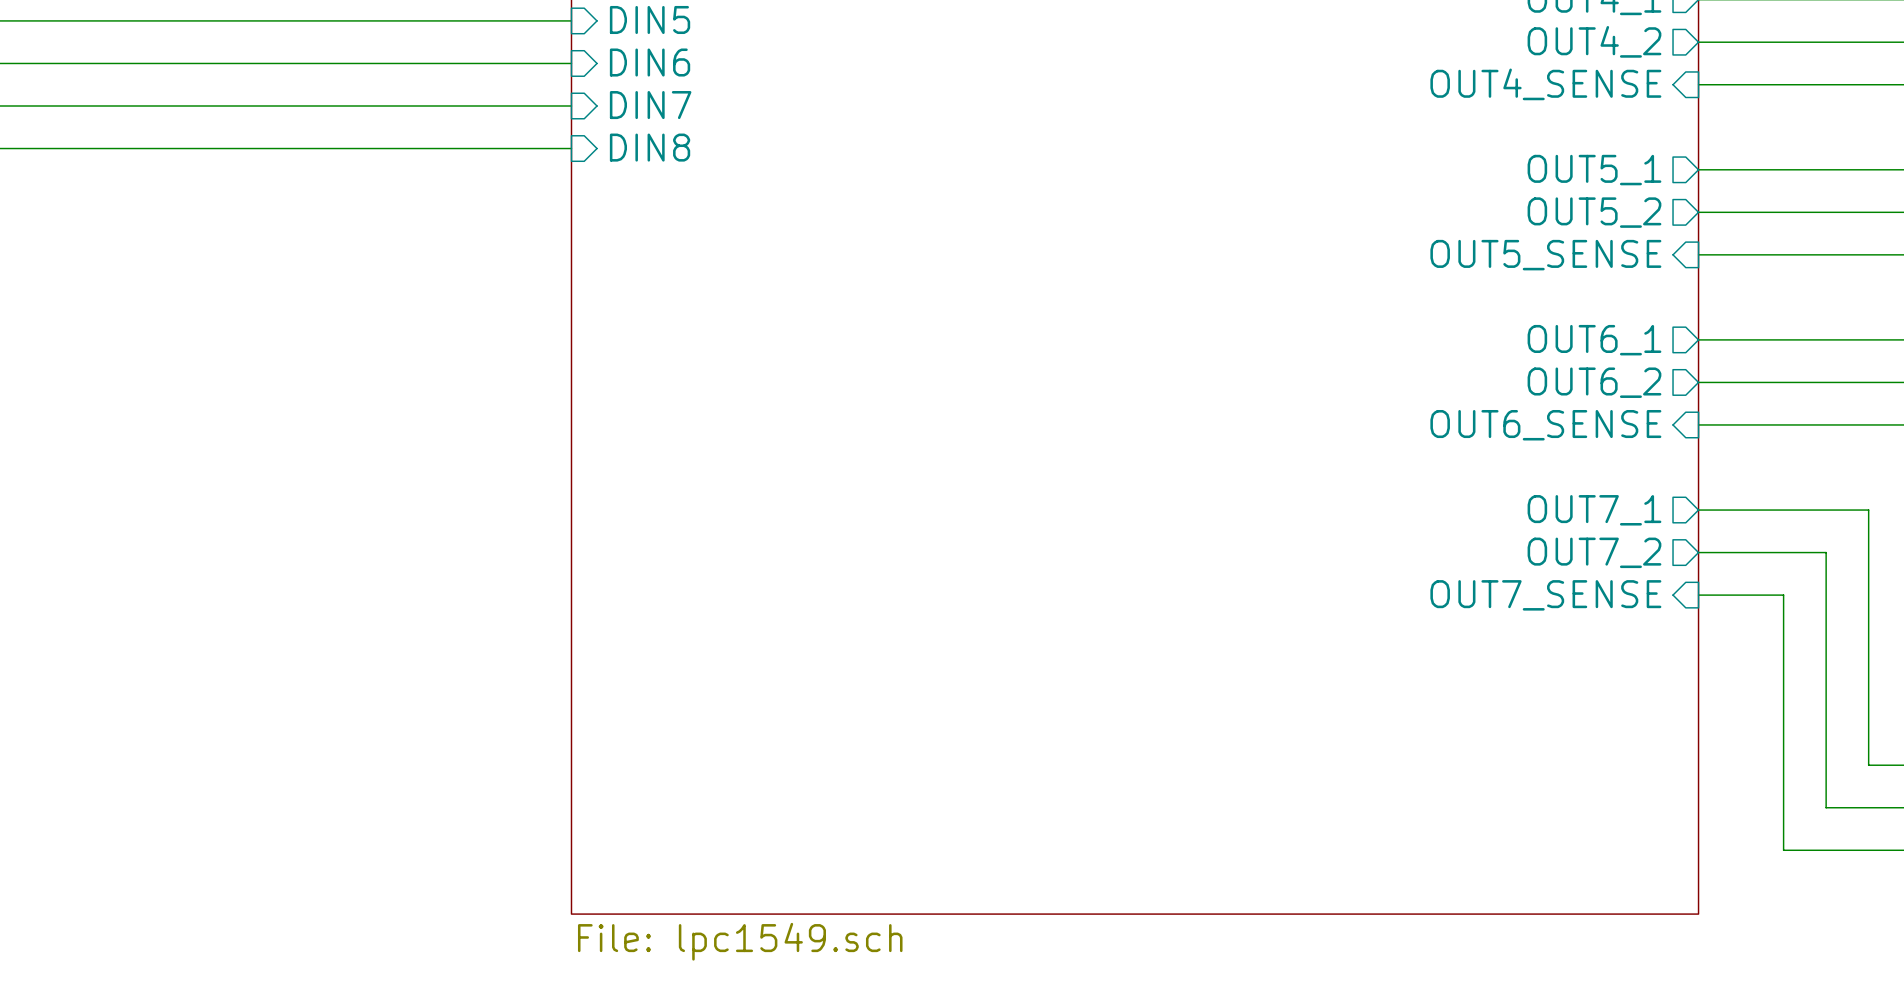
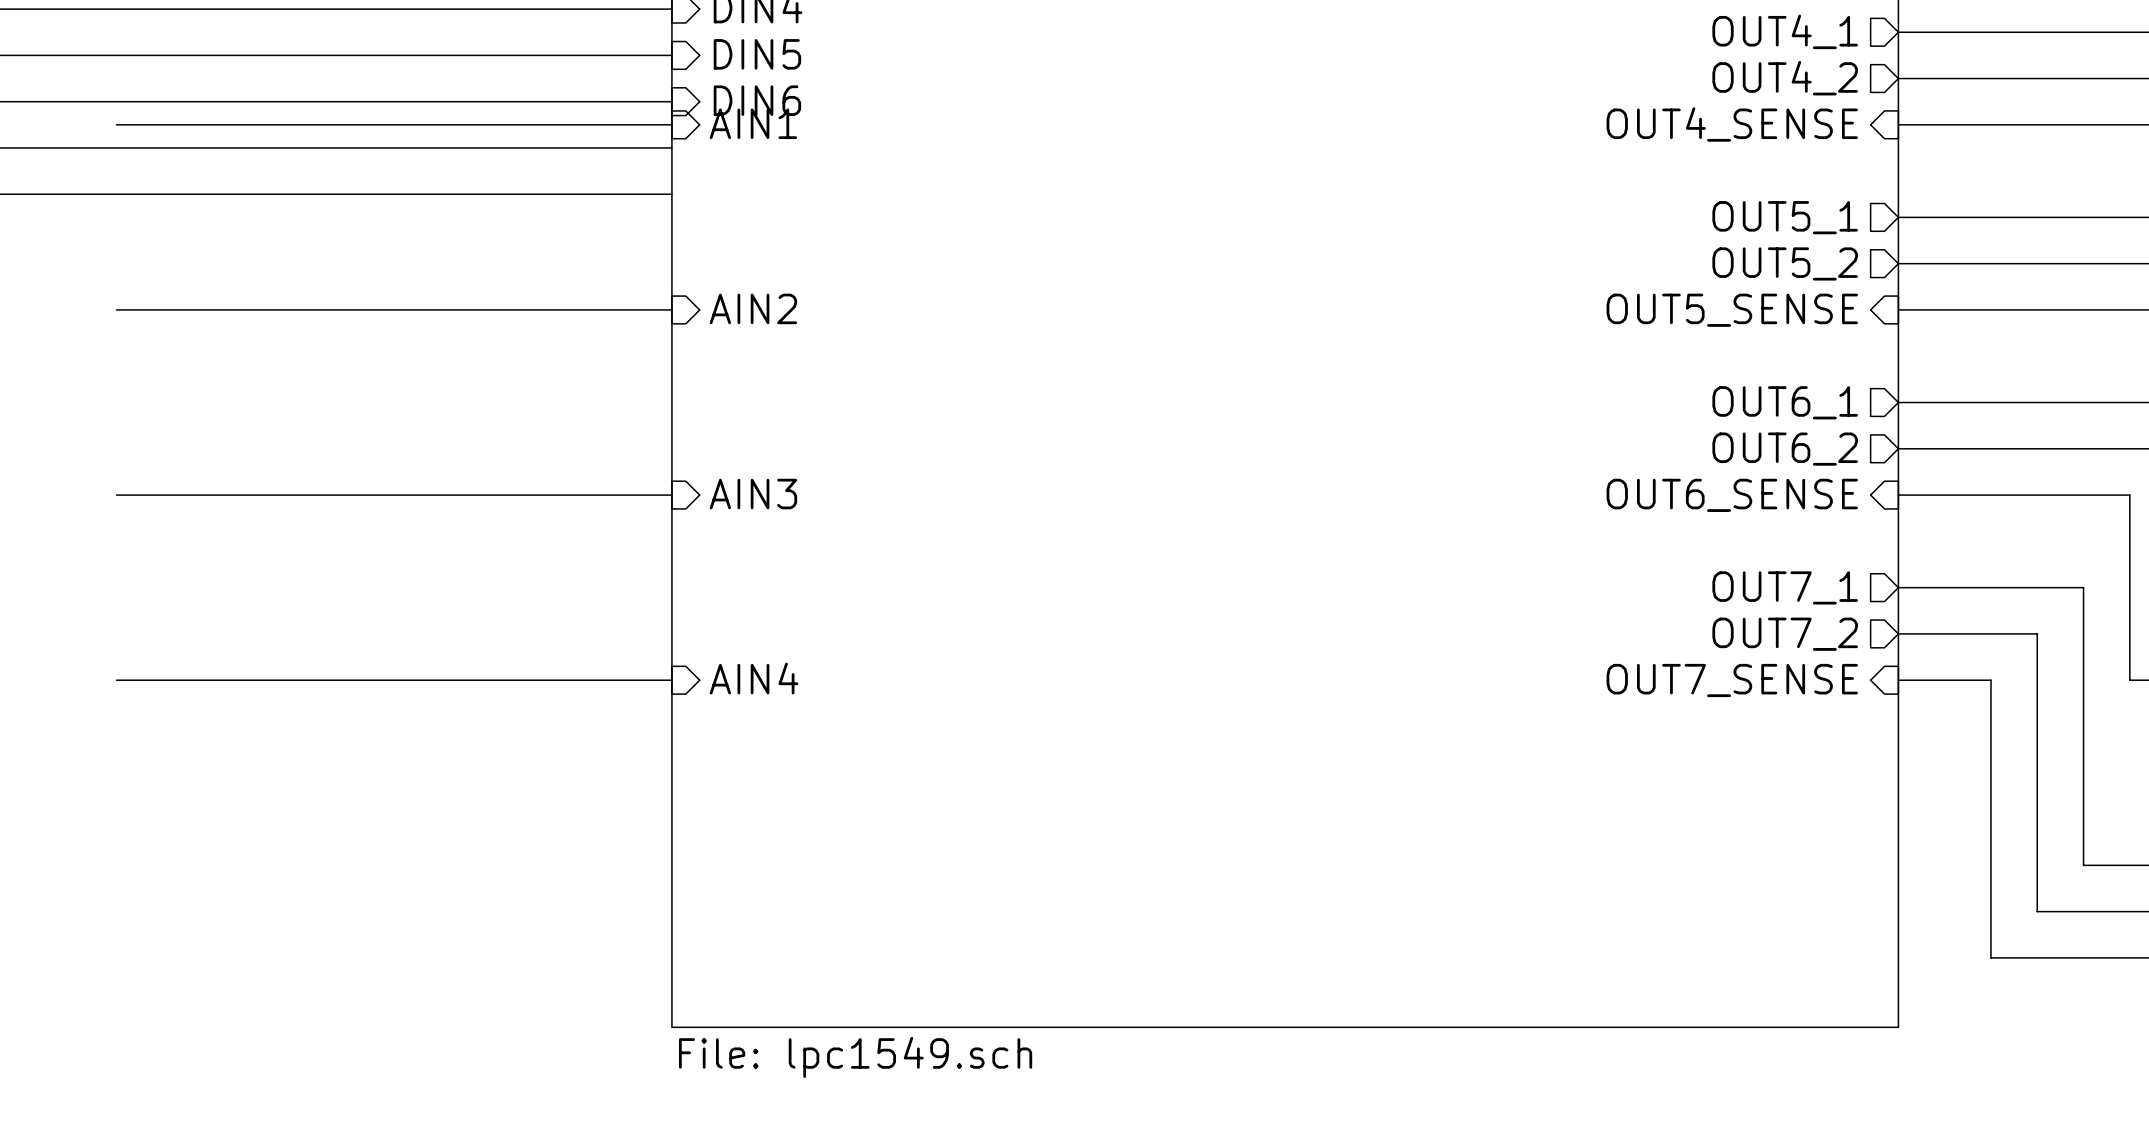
sheet pin: none -> AIN1 (753, 123)
wire: none -> (116, 124) (671, 124)
sheet pin: DIN7 (650, 105) -> none
sheet pin: DIN8 (650, 147) -> none
sheet pin: none -> AIN2 (753, 308)
wire: none -> (116, 309) (671, 309)
wire: none -> (116, 495) (671, 495)
sheet pin: none -> AIN3 (753, 494)
sheet pin: none -> AIN4 (754, 678)
wire: none -> (116, 680) (671, 680)

